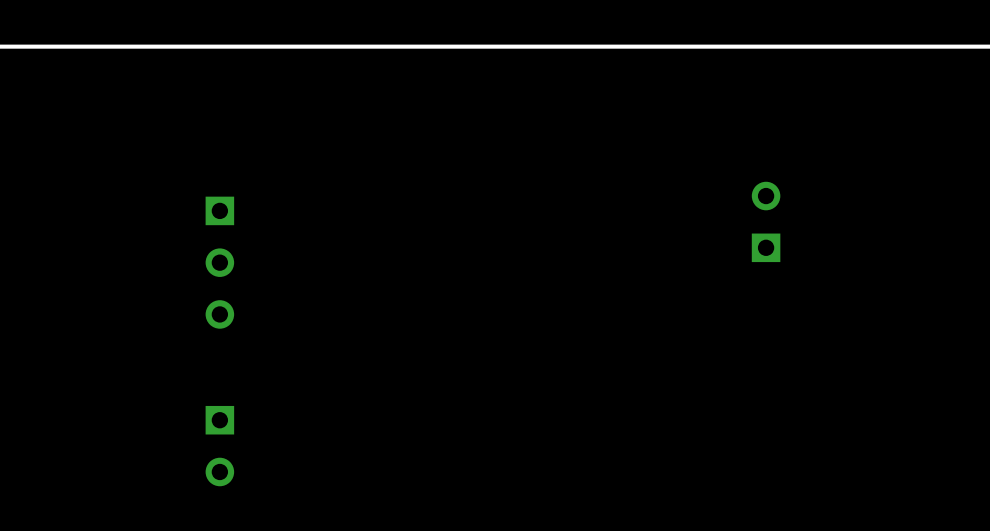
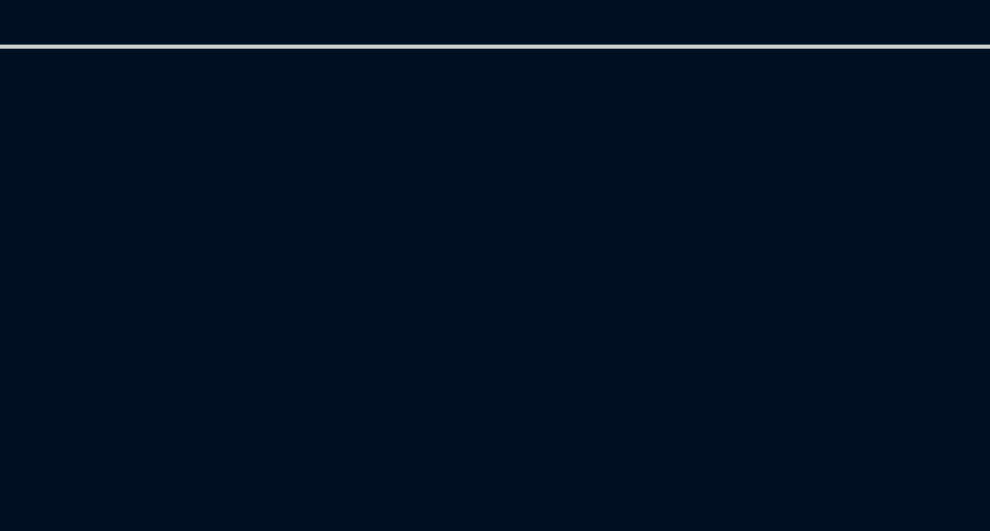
part: (766, 221) -> none
part: (219, 262) -> none
part: (219, 446) -> none

